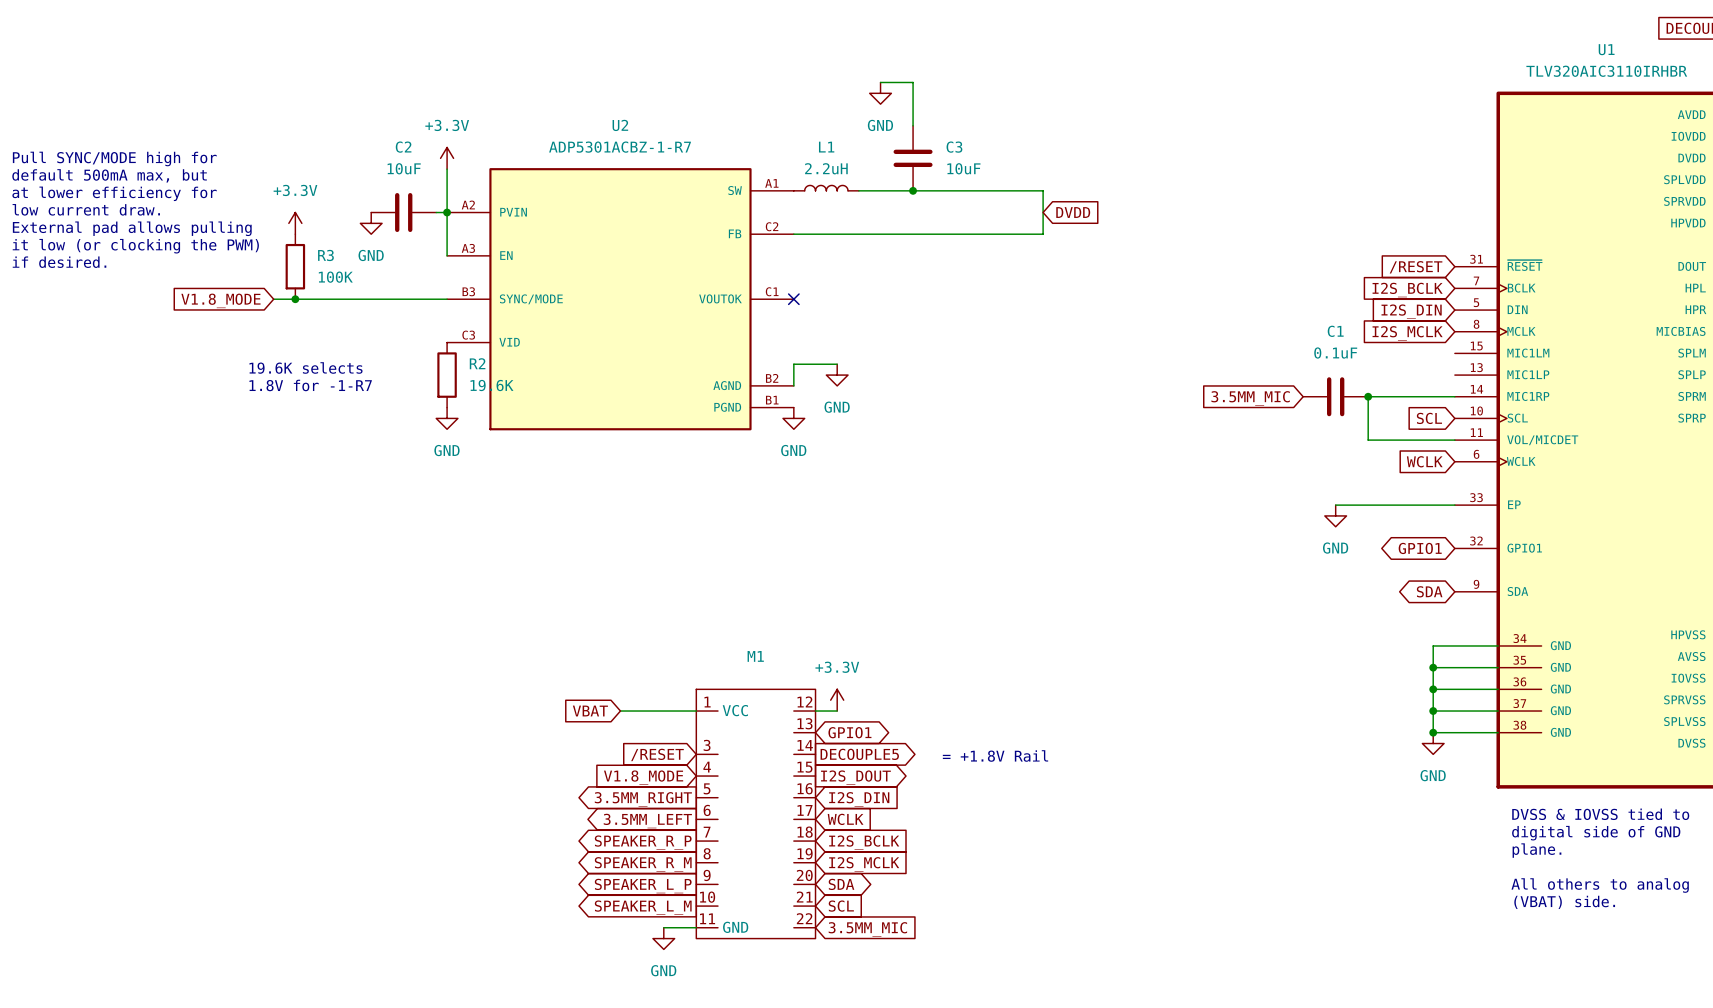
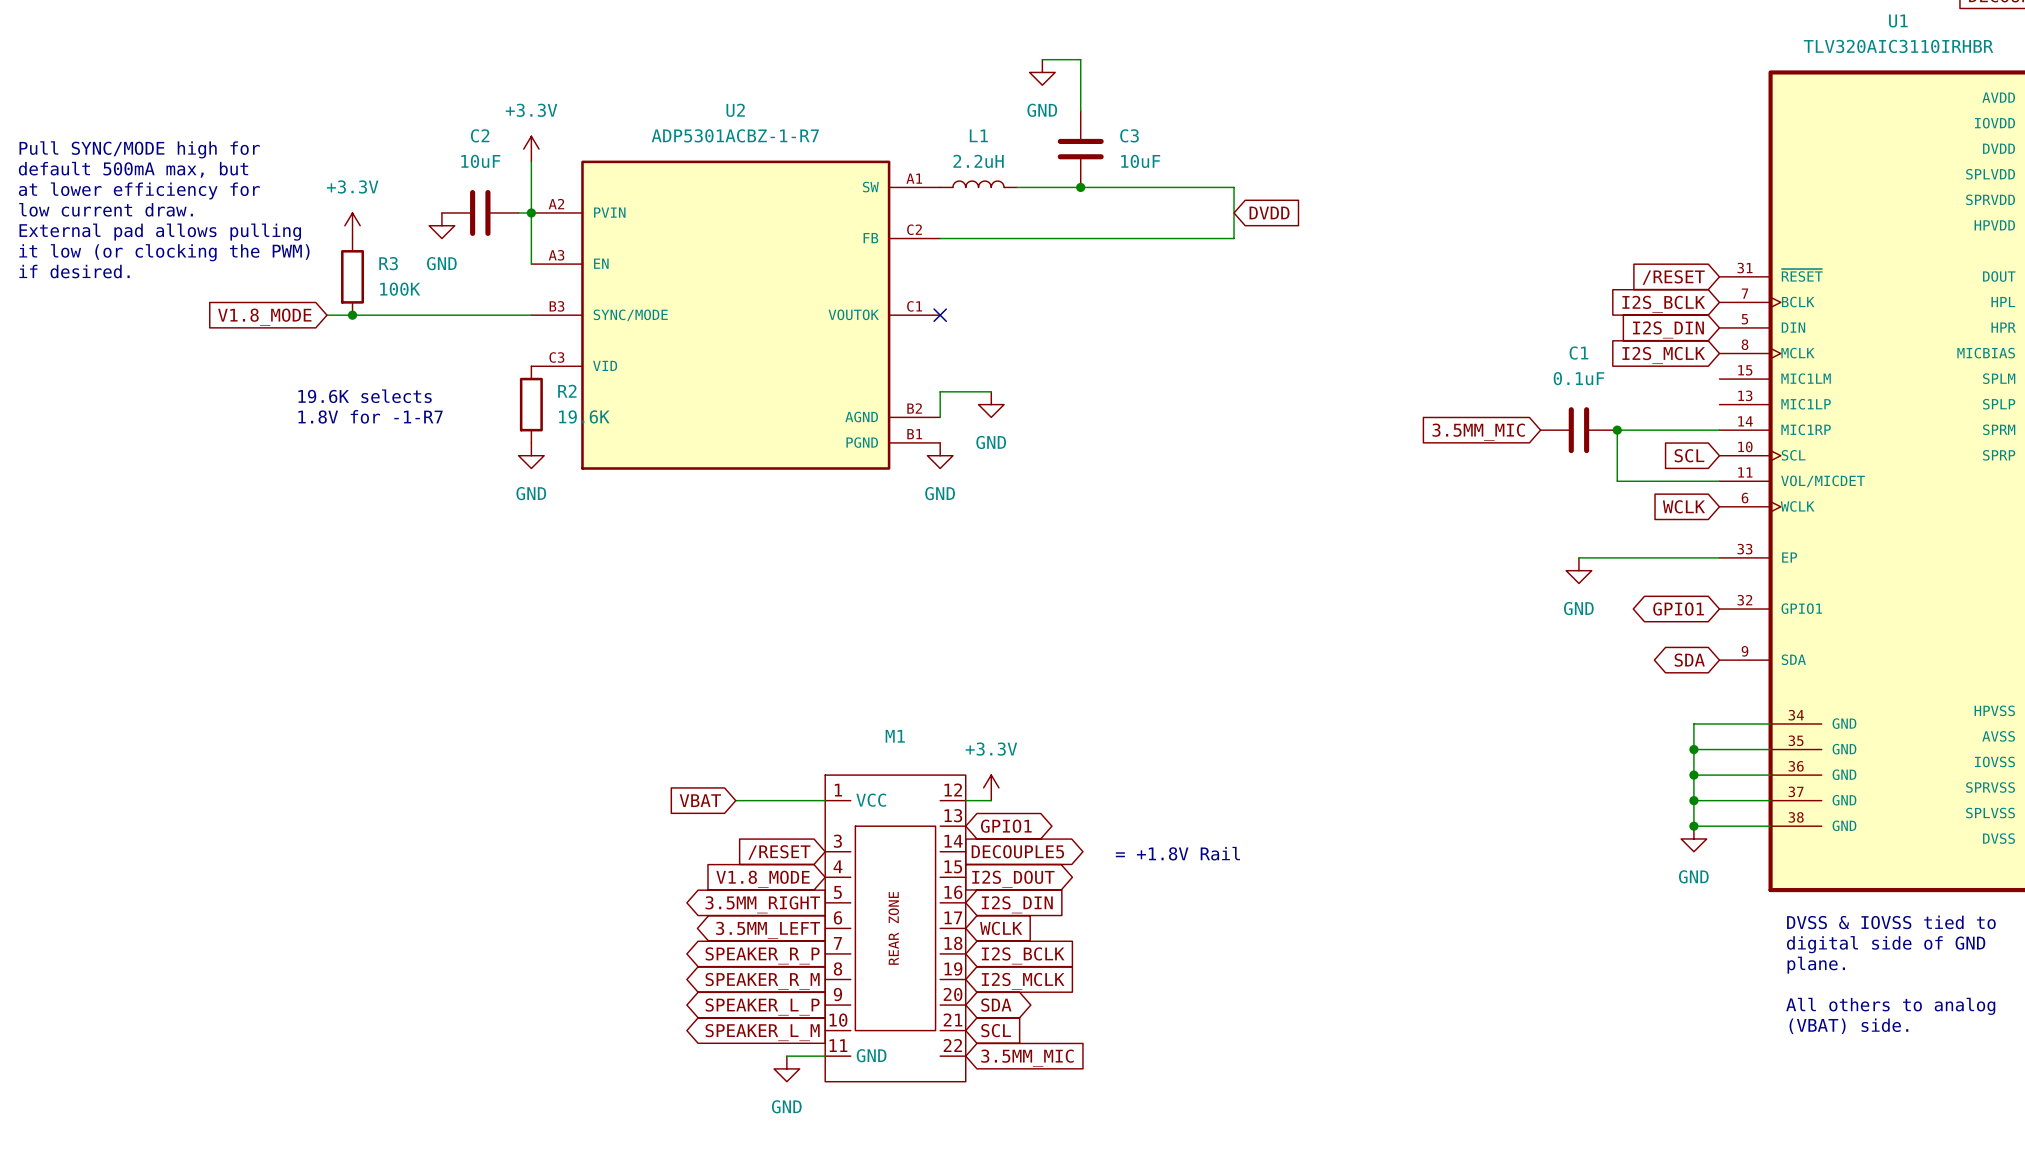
M1 symbol: [696, 689, 816, 939] -> [825, 775, 966, 1082]

